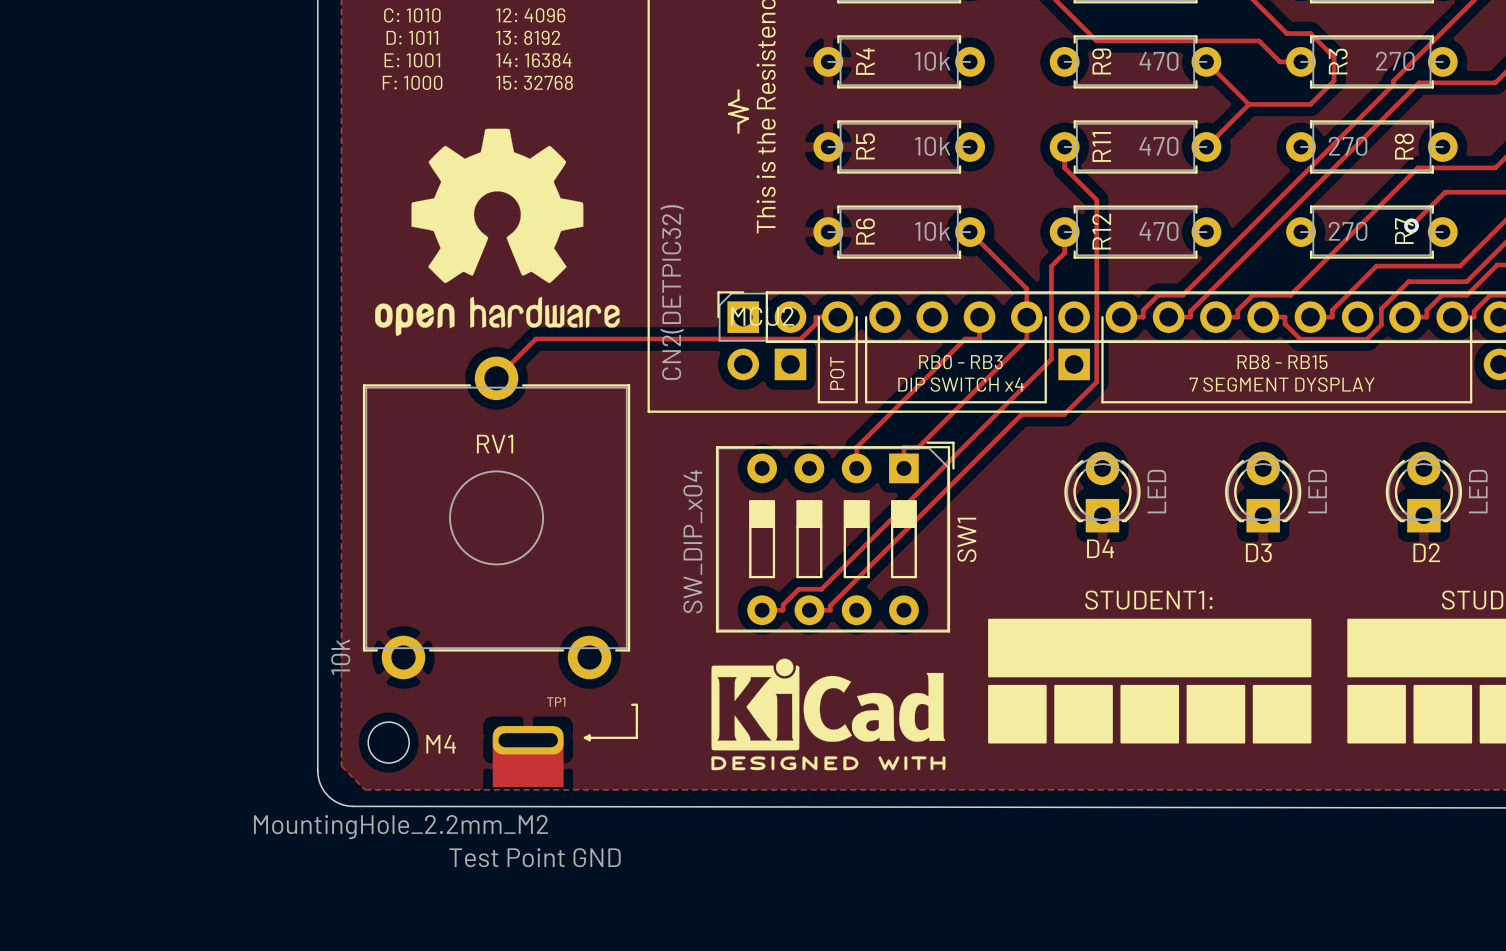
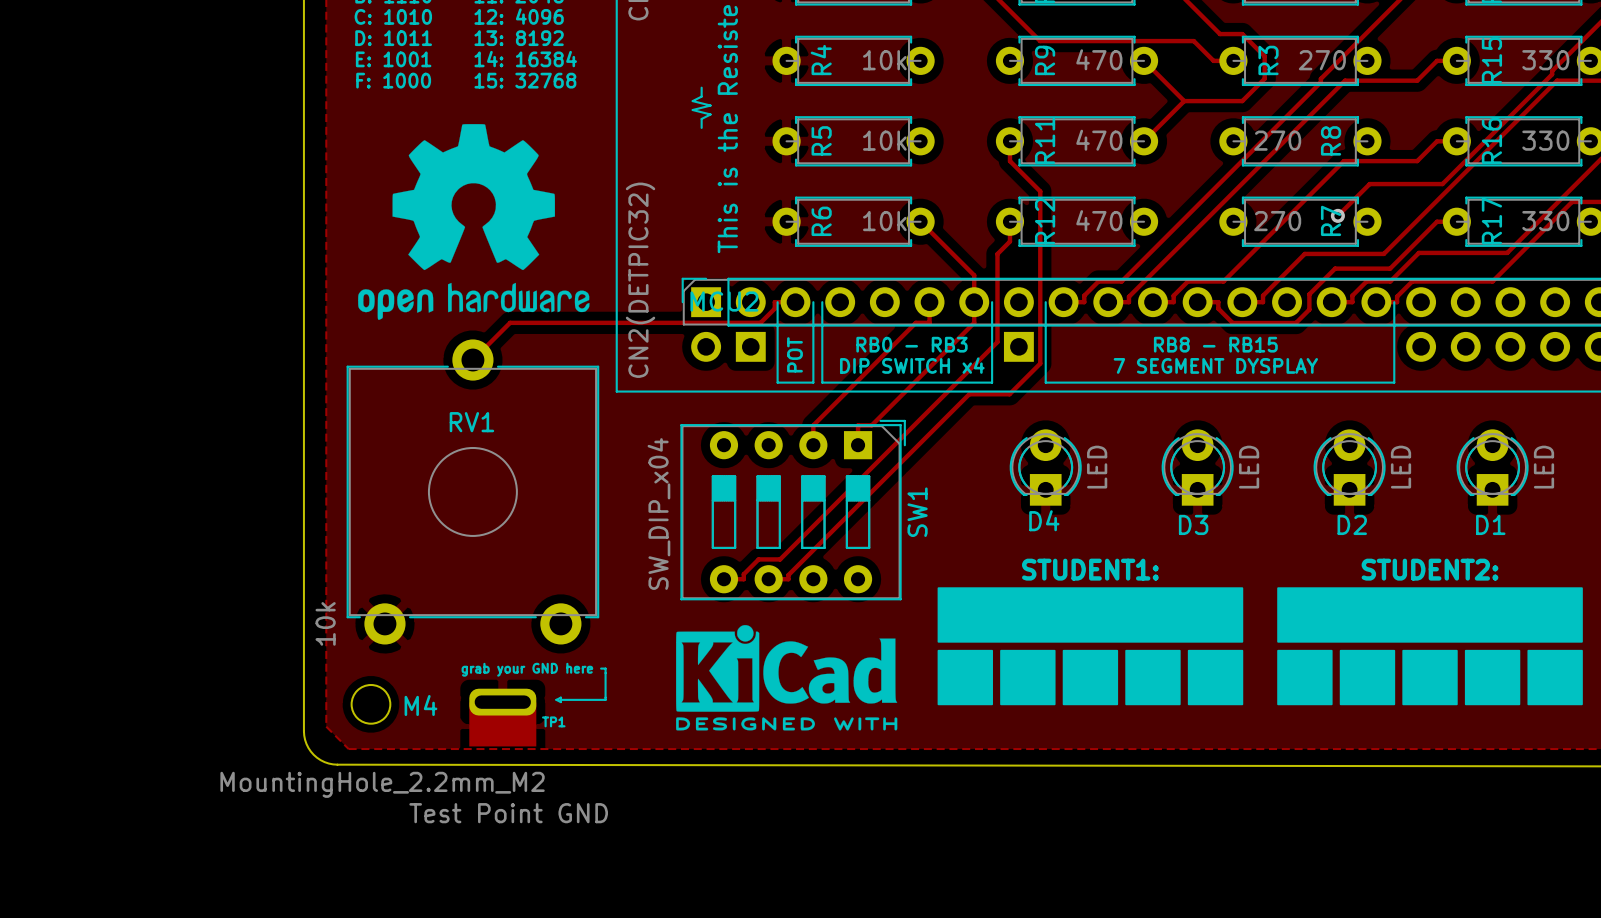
TP1 name position: TP1 (556, 702) -> TP1 (553, 721)
text: none -> grab your GND here (527, 669)

